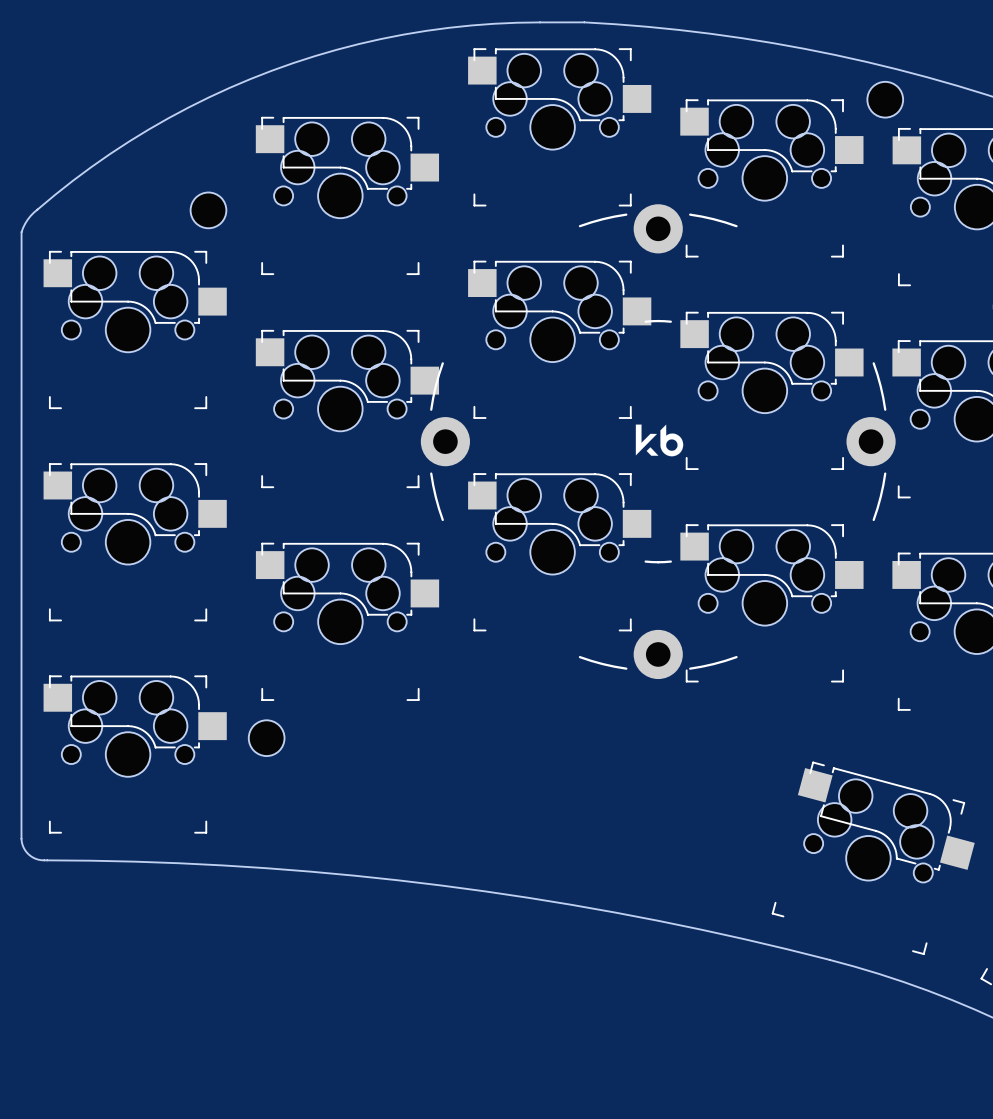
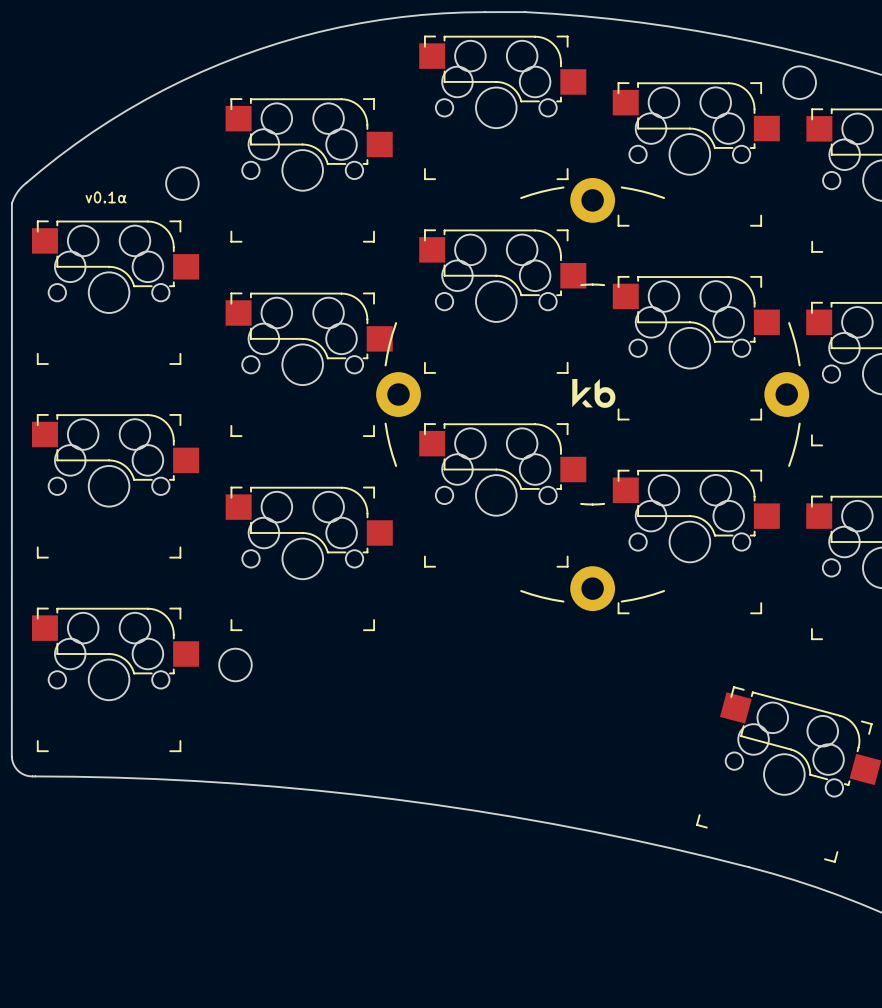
text: none -> v0.1α (106, 197)

